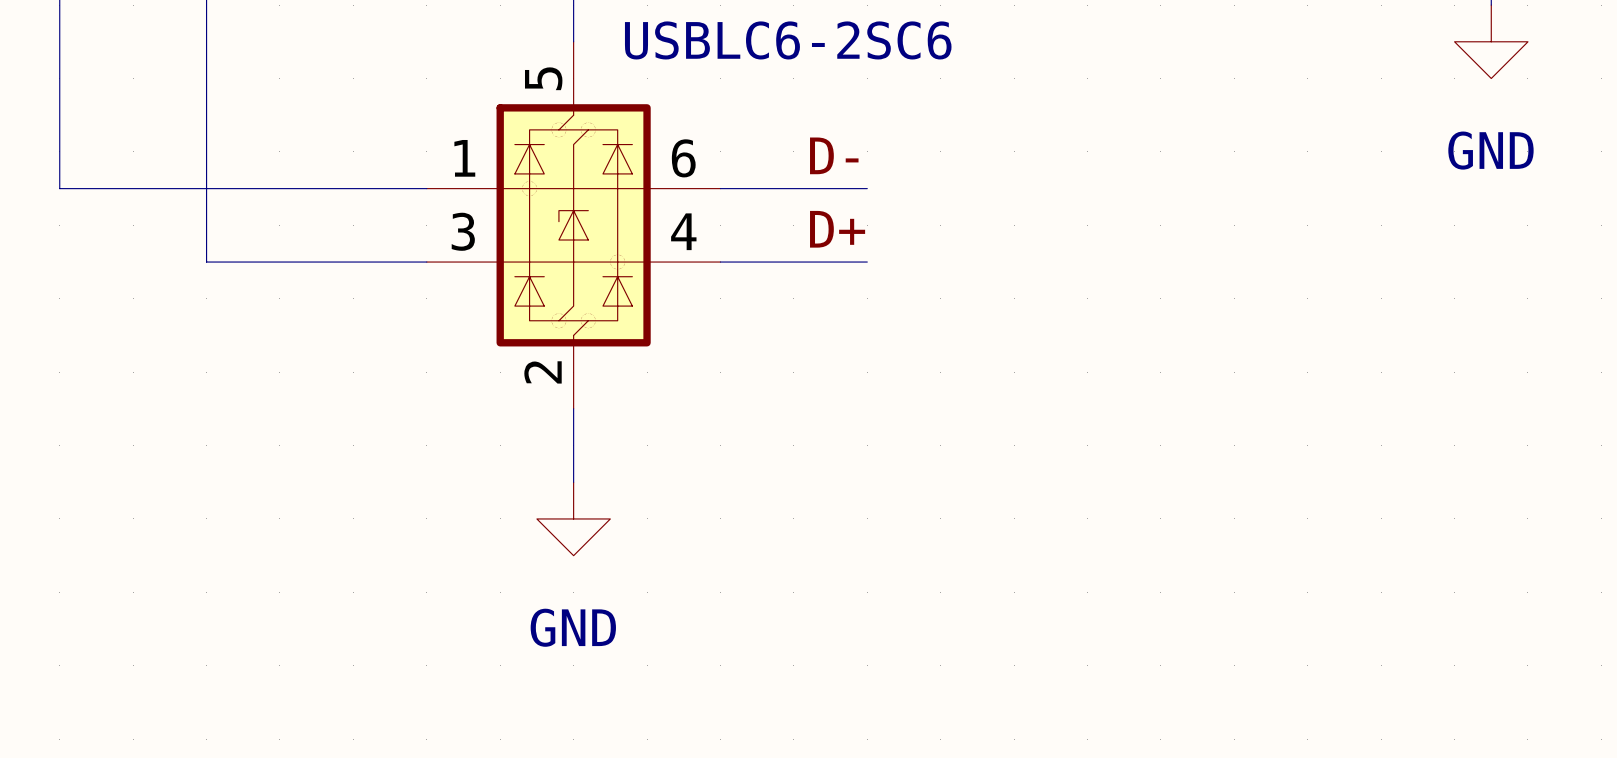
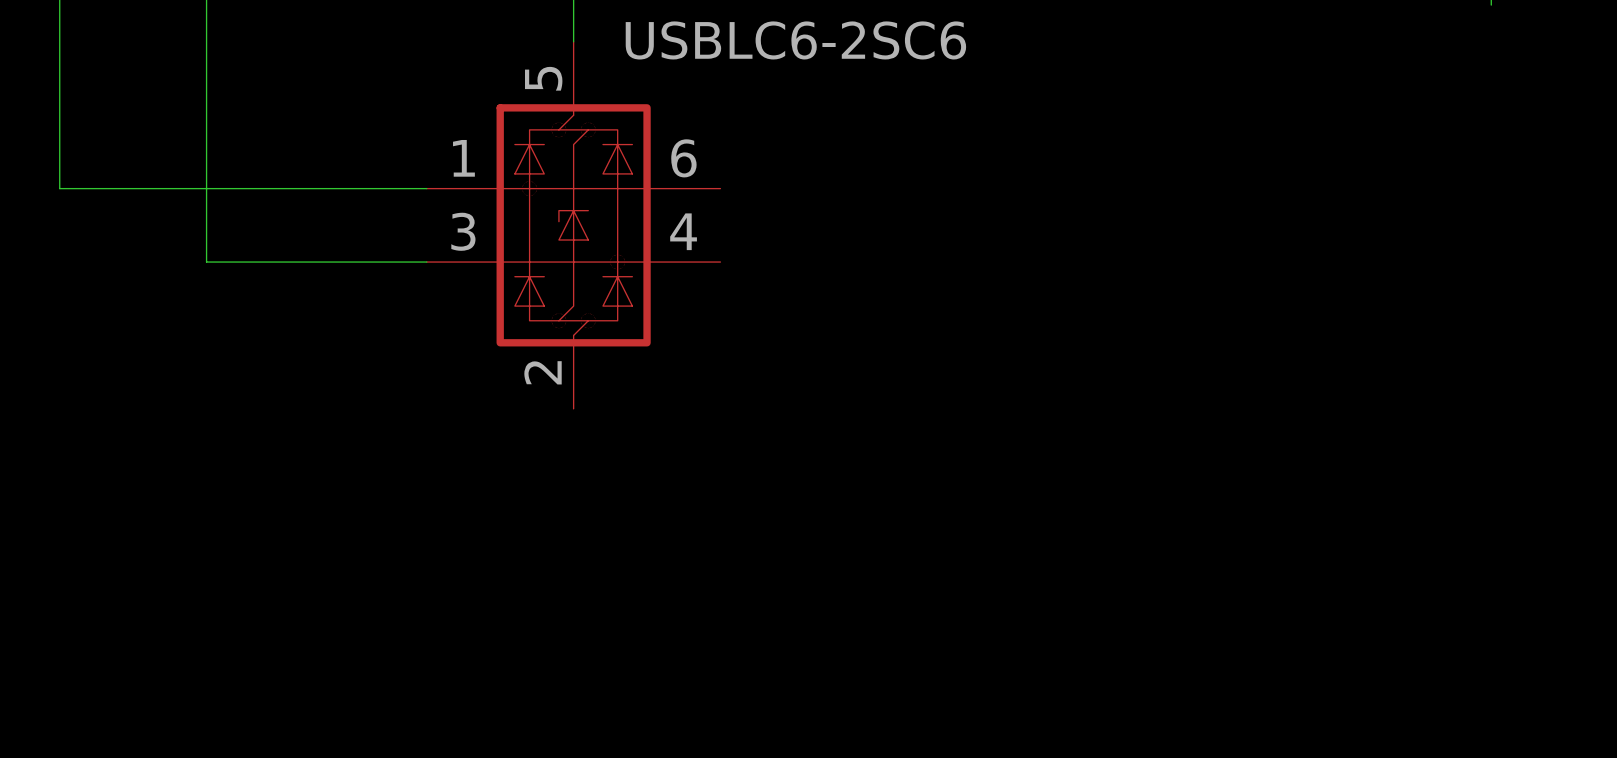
power symbol: GND (1491, 41) -> none
label: D- (834, 155) -> none
wire: (720, 188) (867, 188) -> none
label: D+ (837, 229) -> none
wire: (720, 262) (867, 262) -> none
wire: (573, 408) (573, 482) -> none
power symbol: GND (573, 518) -> none

